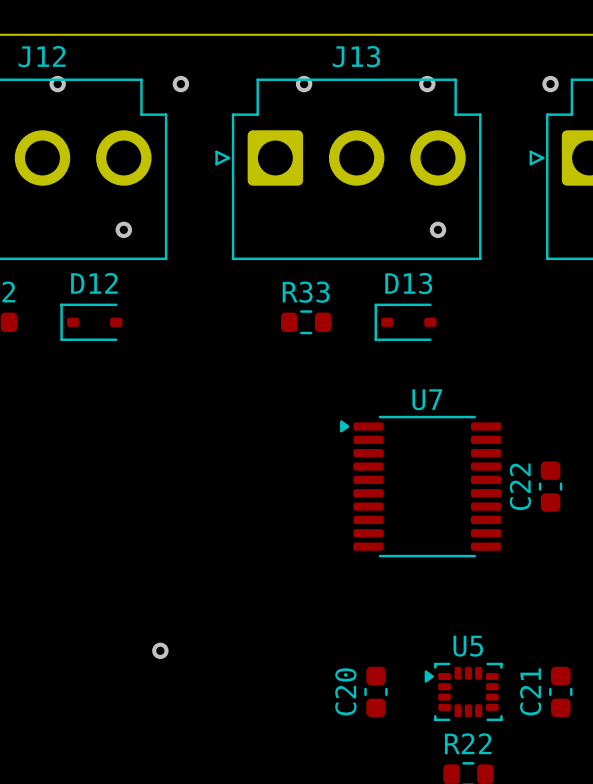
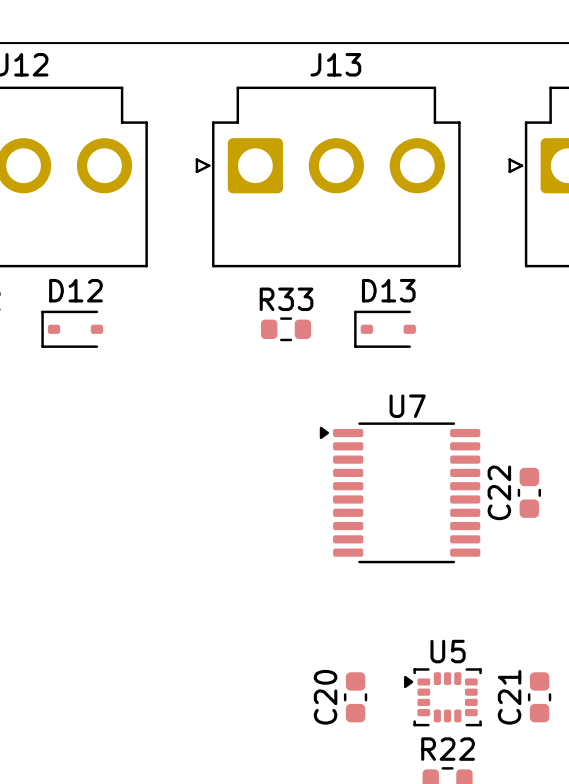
via: (57, 84) -> none
via: (180, 84) -> none
via: (304, 84) -> none
via: (427, 84) -> none
via: (550, 84) -> none
via: (123, 229) -> none
via: (438, 229) -> none
via: (160, 650) -> none

